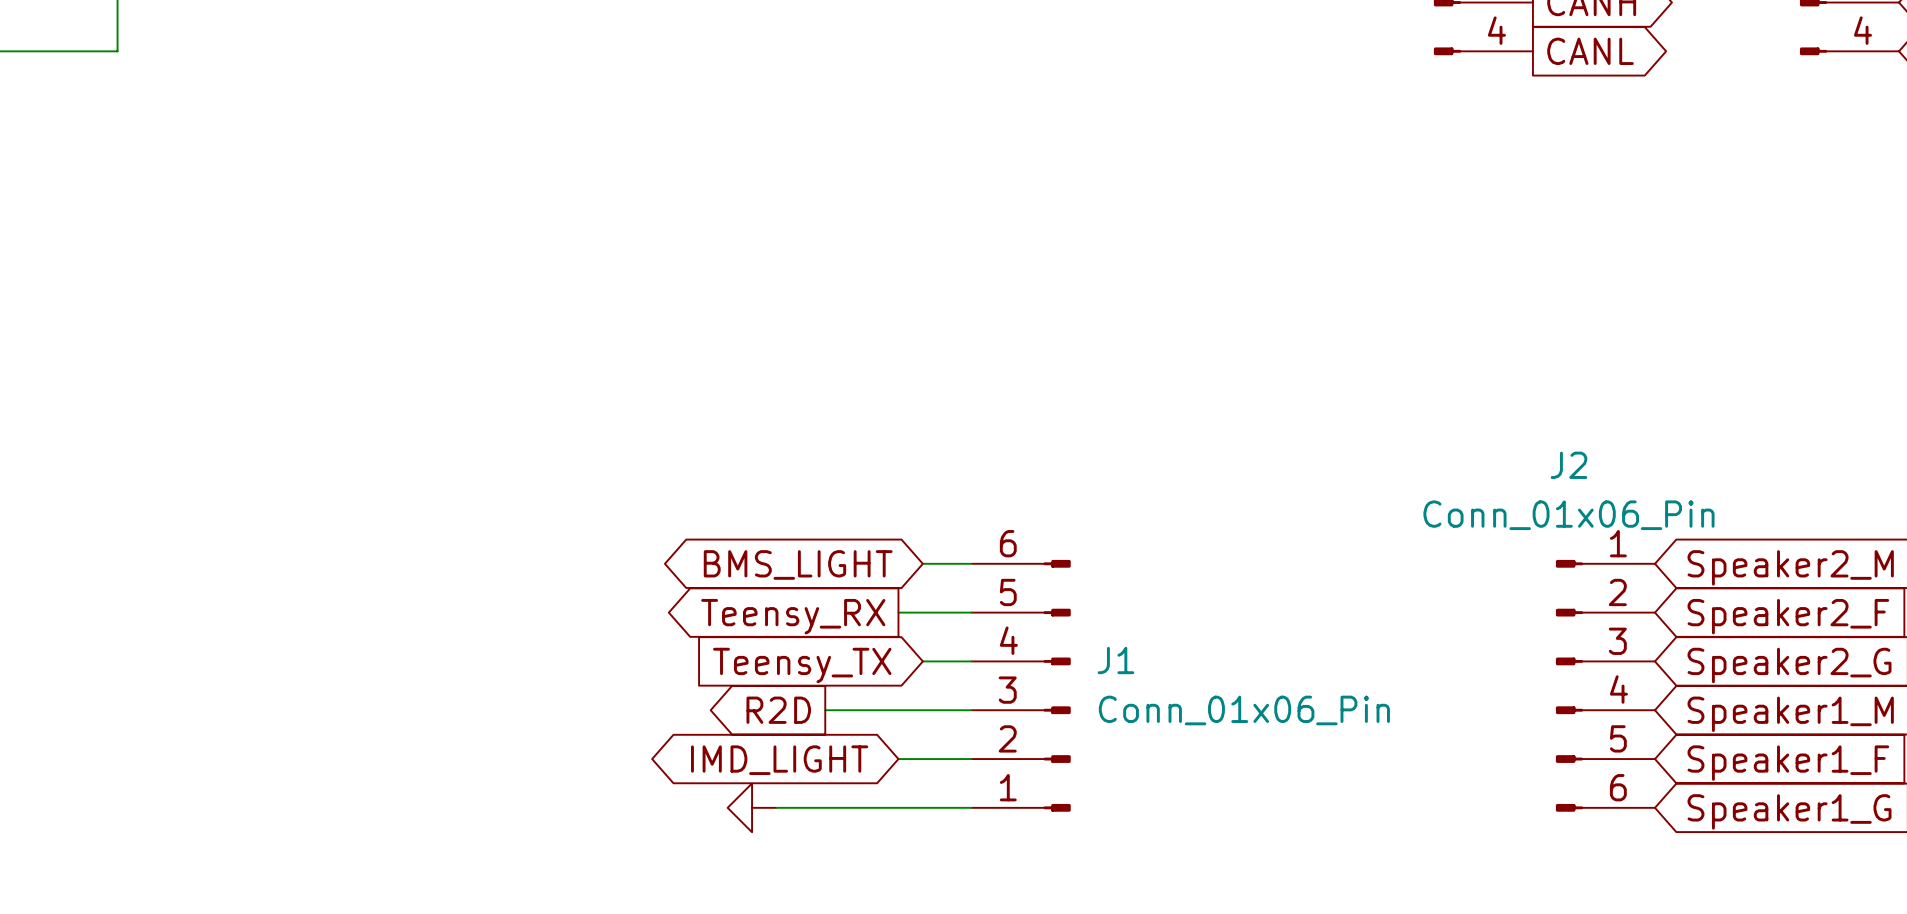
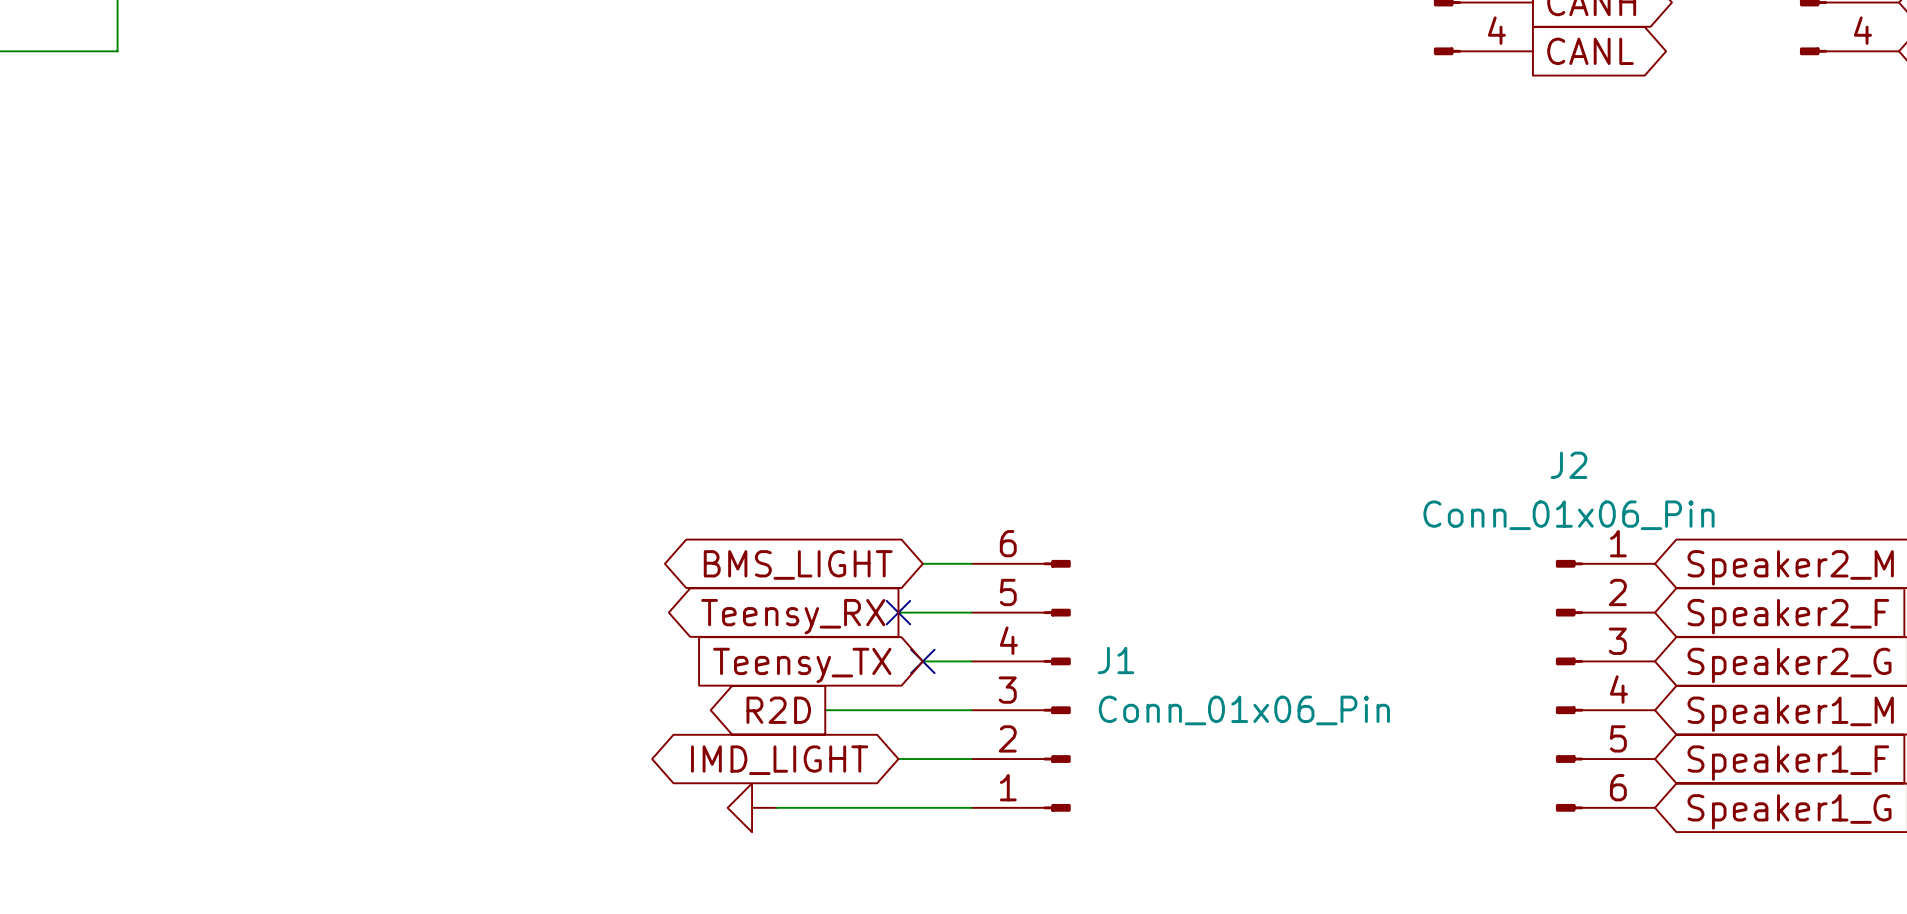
no-connect mark: none -> (898, 612)
no-connect mark: none -> (922, 661)

